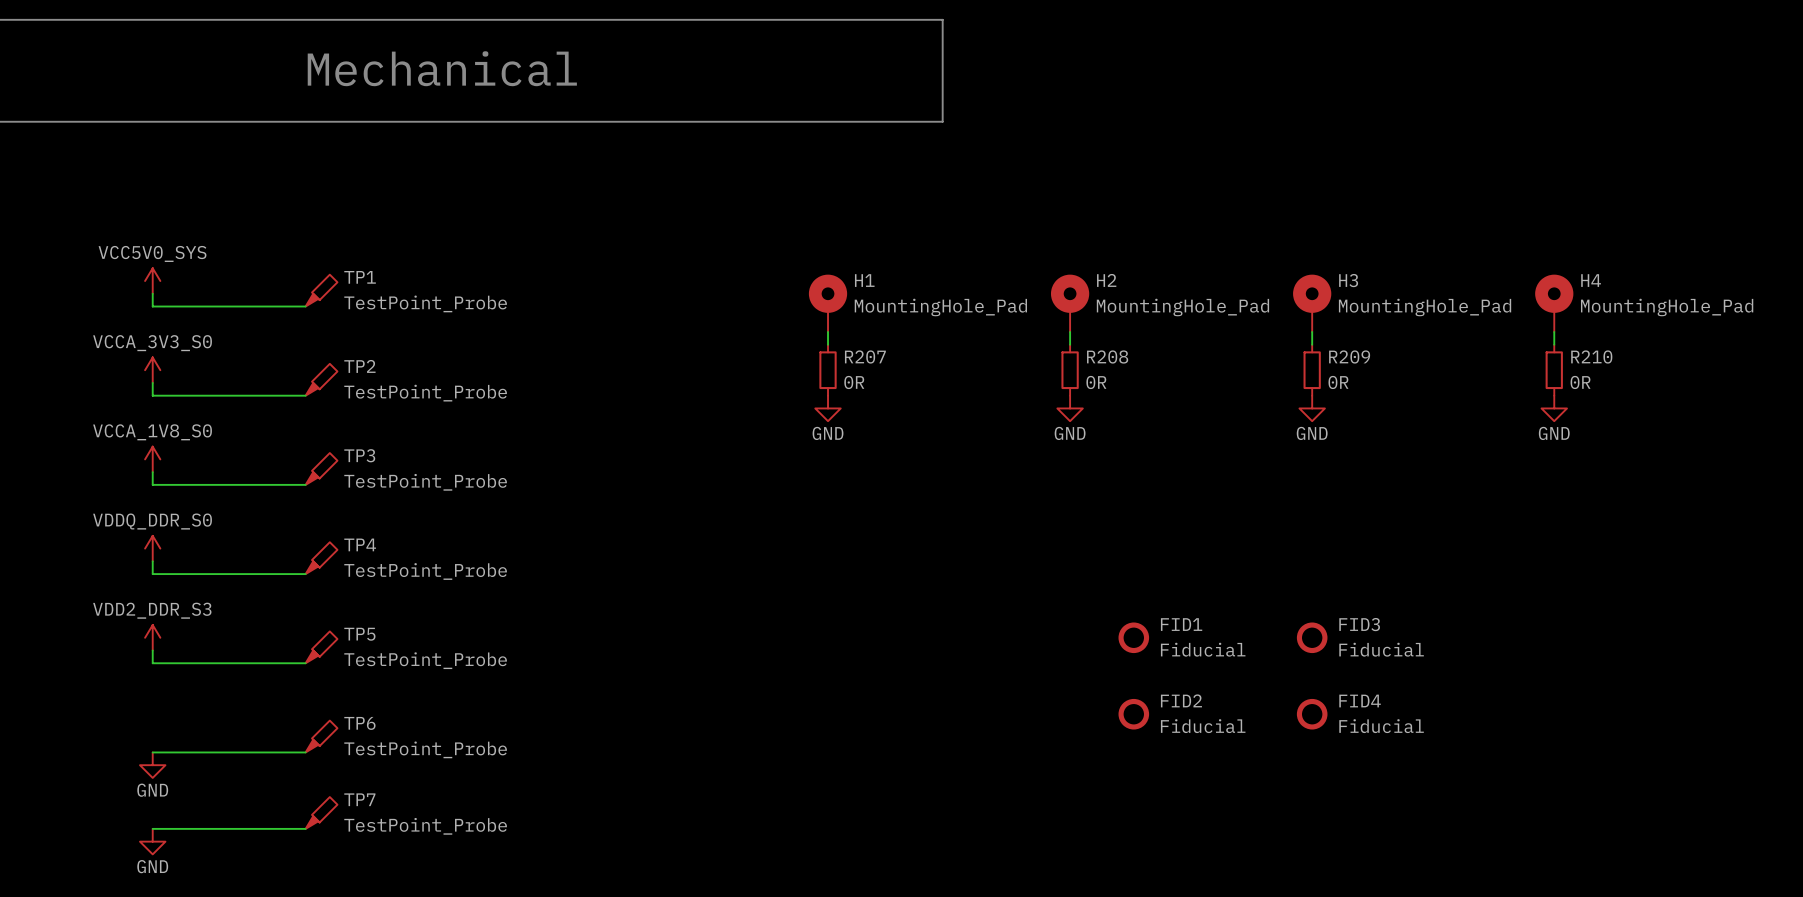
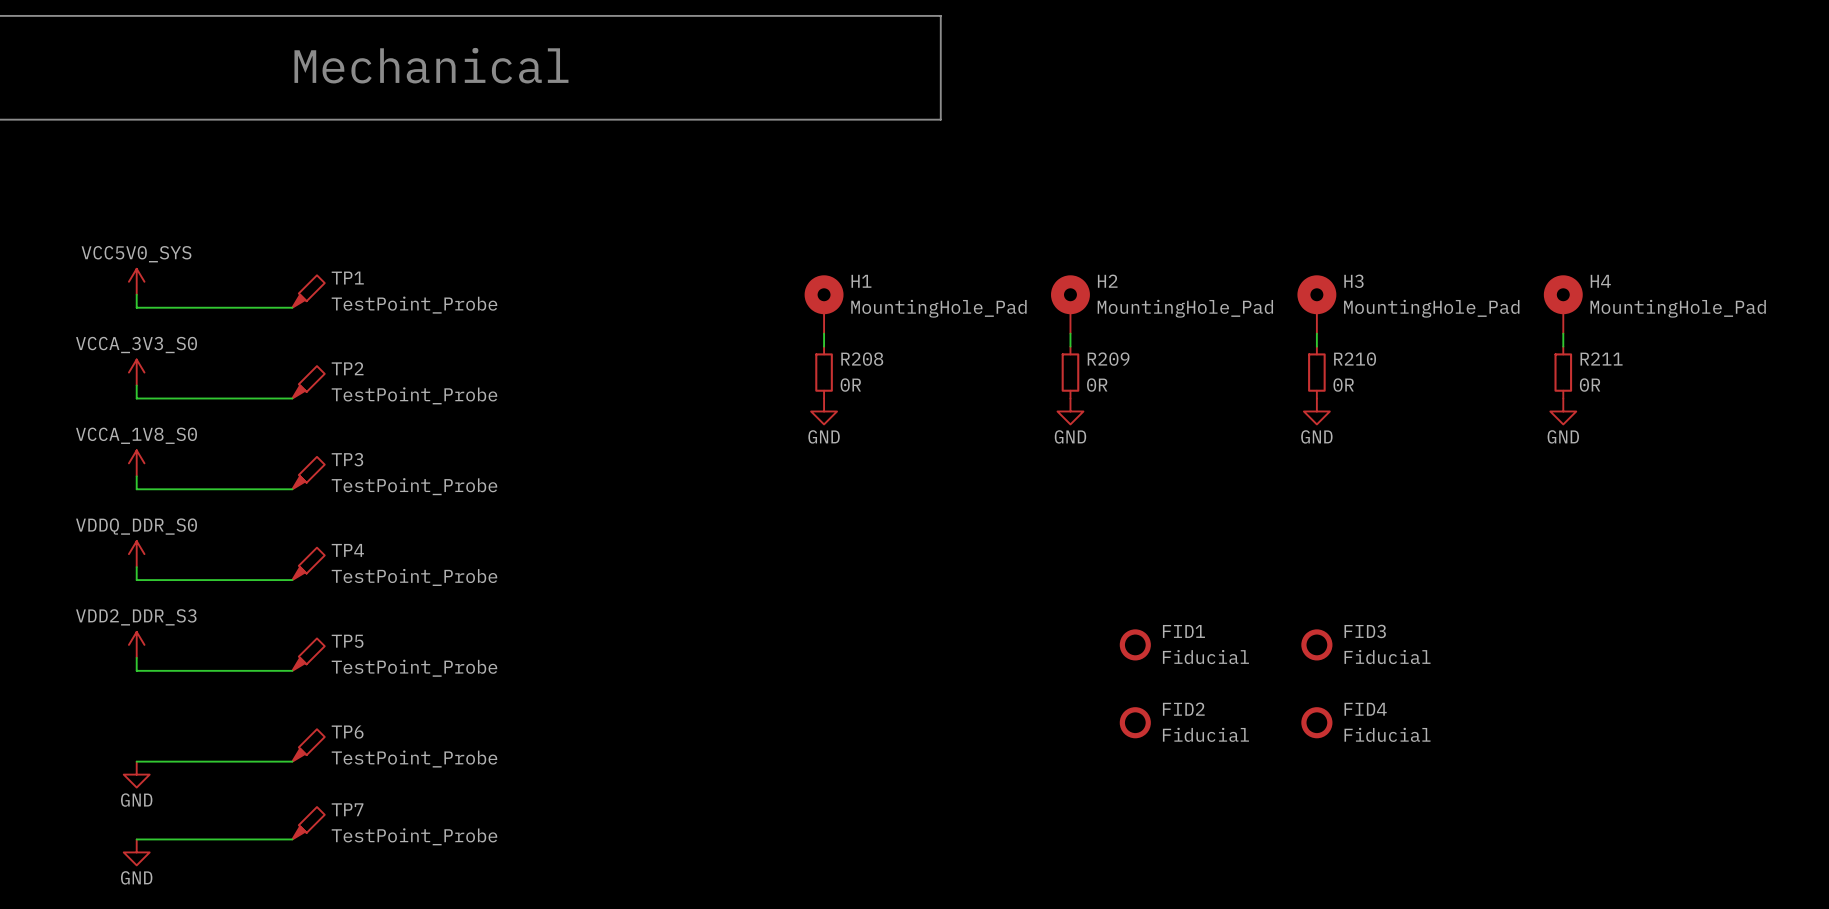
R207 name: R207 (865, 356) -> R208 (862, 359)
R208 name: R208 (1107, 356) -> R209 (1108, 359)
R209 name: R209 (1349, 356) -> R210 (1355, 359)
R210 name: R210 (1591, 356) -> R211 (1601, 359)

